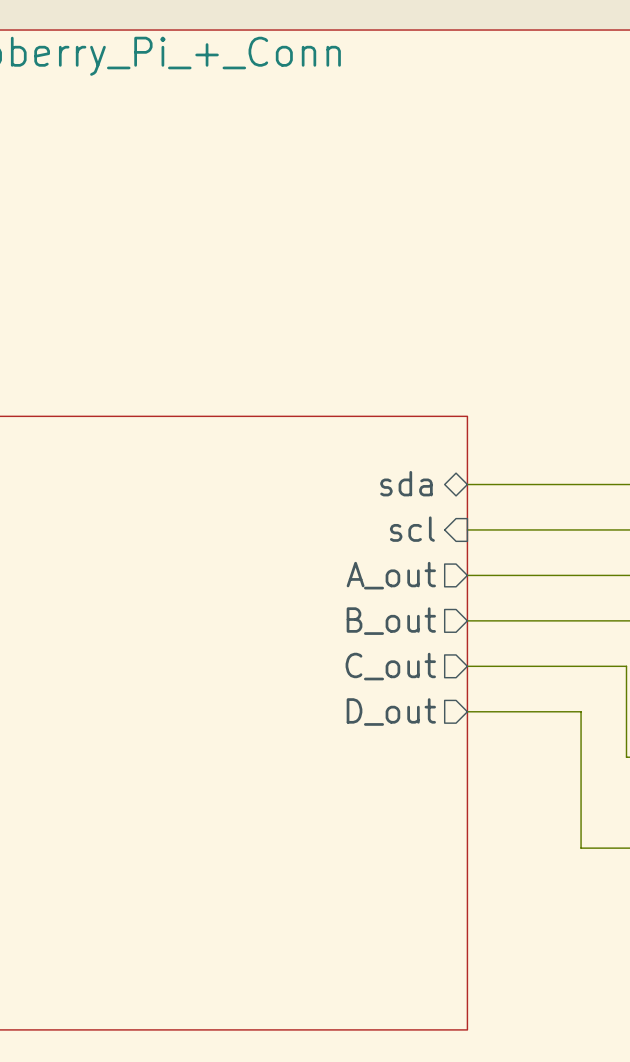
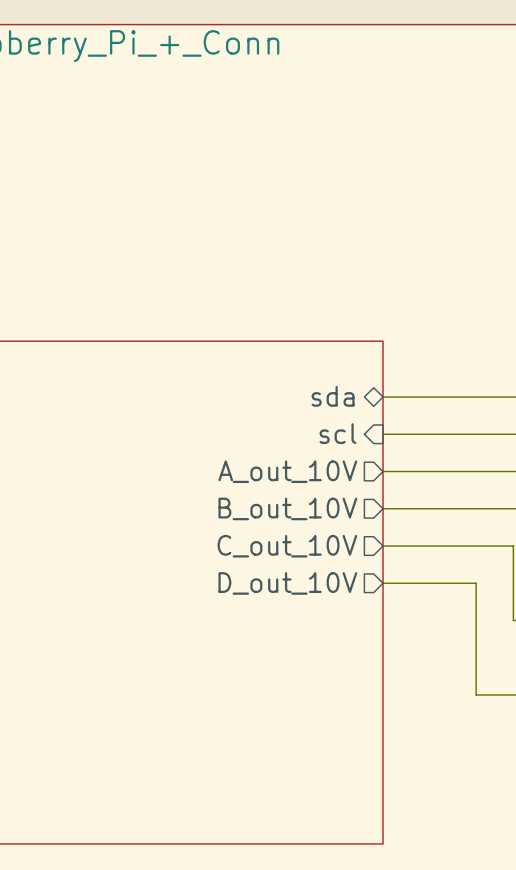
sheet pin: A_out (391, 575) -> A_out_10V (287, 471)
sheet pin: B_out (391, 621) -> B_out_10V (287, 508)
sheet pin: C_out (390, 666) -> C_out_10V (287, 546)
sheet pin: D_out (391, 712) -> D_out_10V (287, 583)

